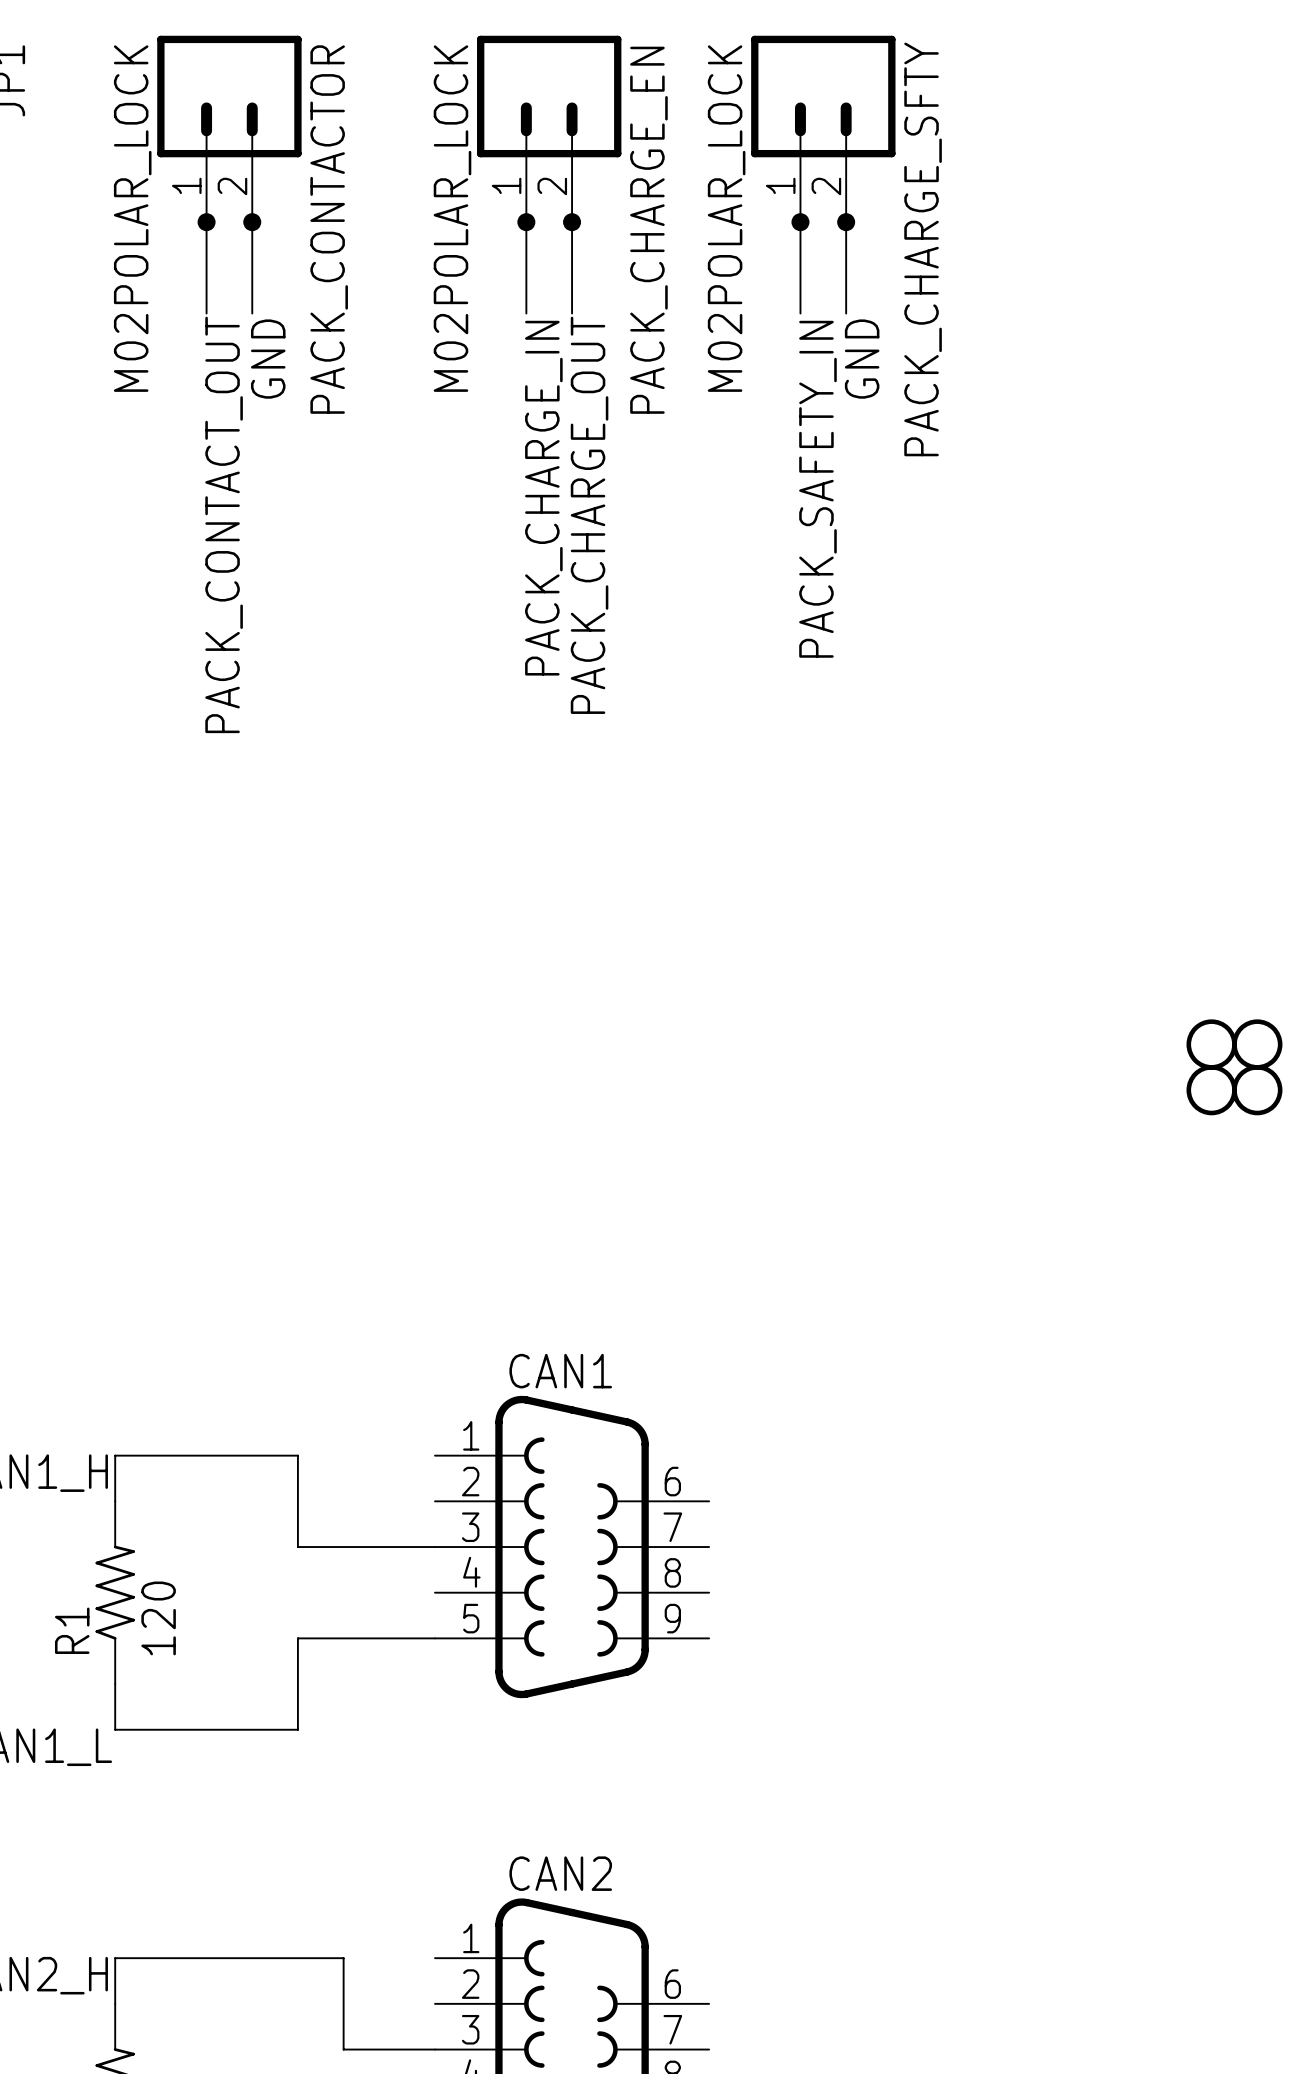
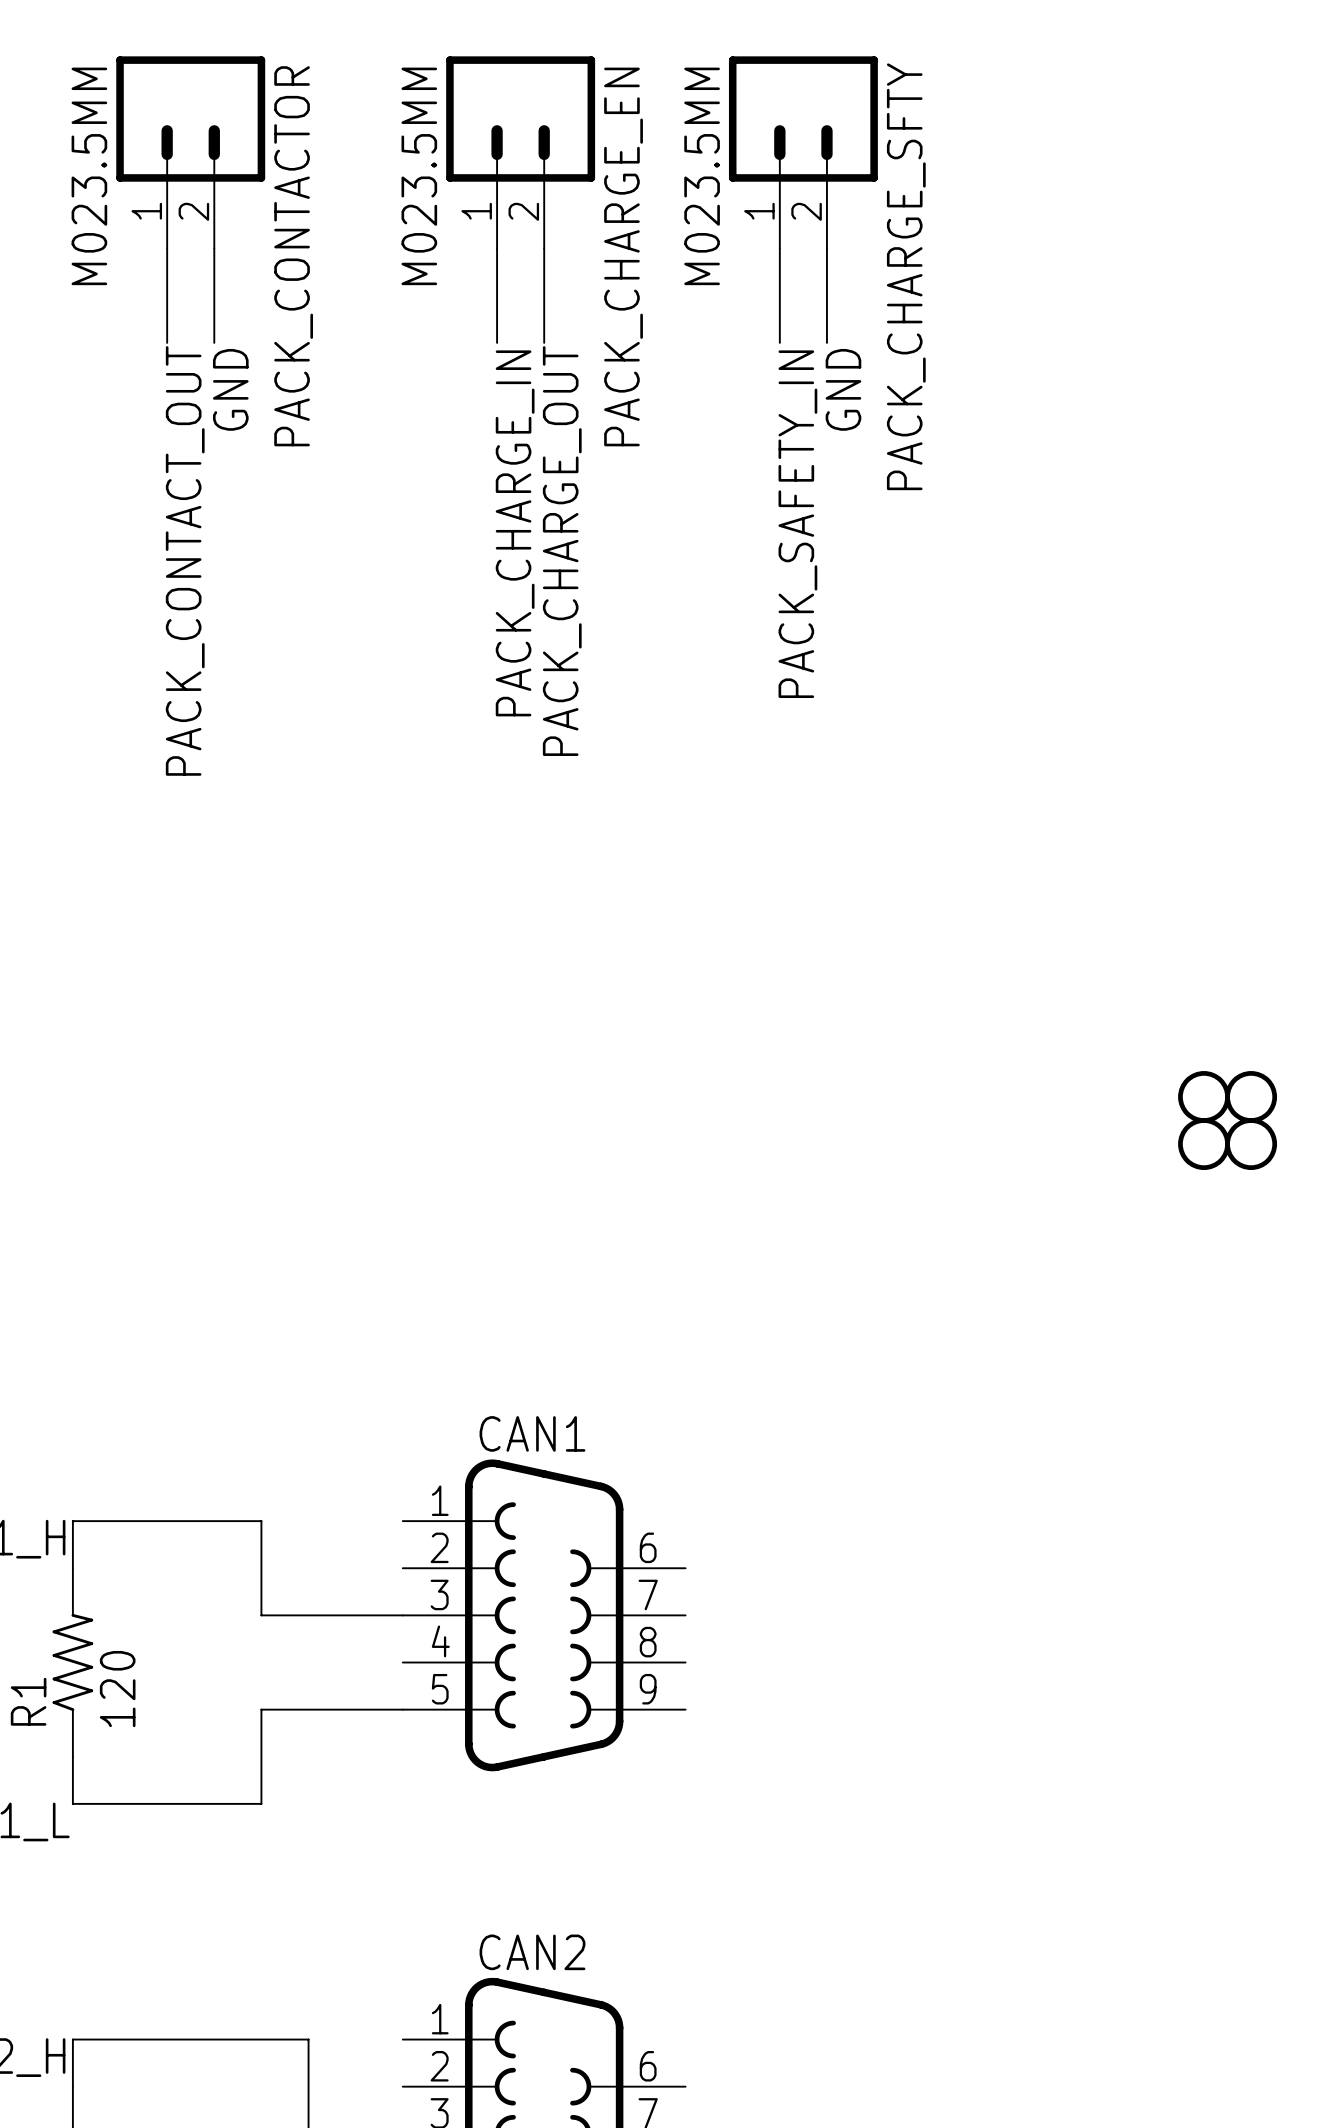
PACK_CONTACTOR value: M02POLAR_LOCK (132, 218) -> M023.5MM (89, 176)
PACK_CHARGE_EN value: M02POLAR_LOCK (452, 218) -> M023.5MM (419, 176)
PACK_CHARGE_SFTY value: M02POLAR_LOCK (726, 218) -> M023.5MM (702, 176)
junction: (206, 222) -> none
junction: (252, 222) -> none
junction: (526, 222) -> none
junction: (572, 222) -> none
junction: (800, 222) -> none
junction: (846, 222) -> none

